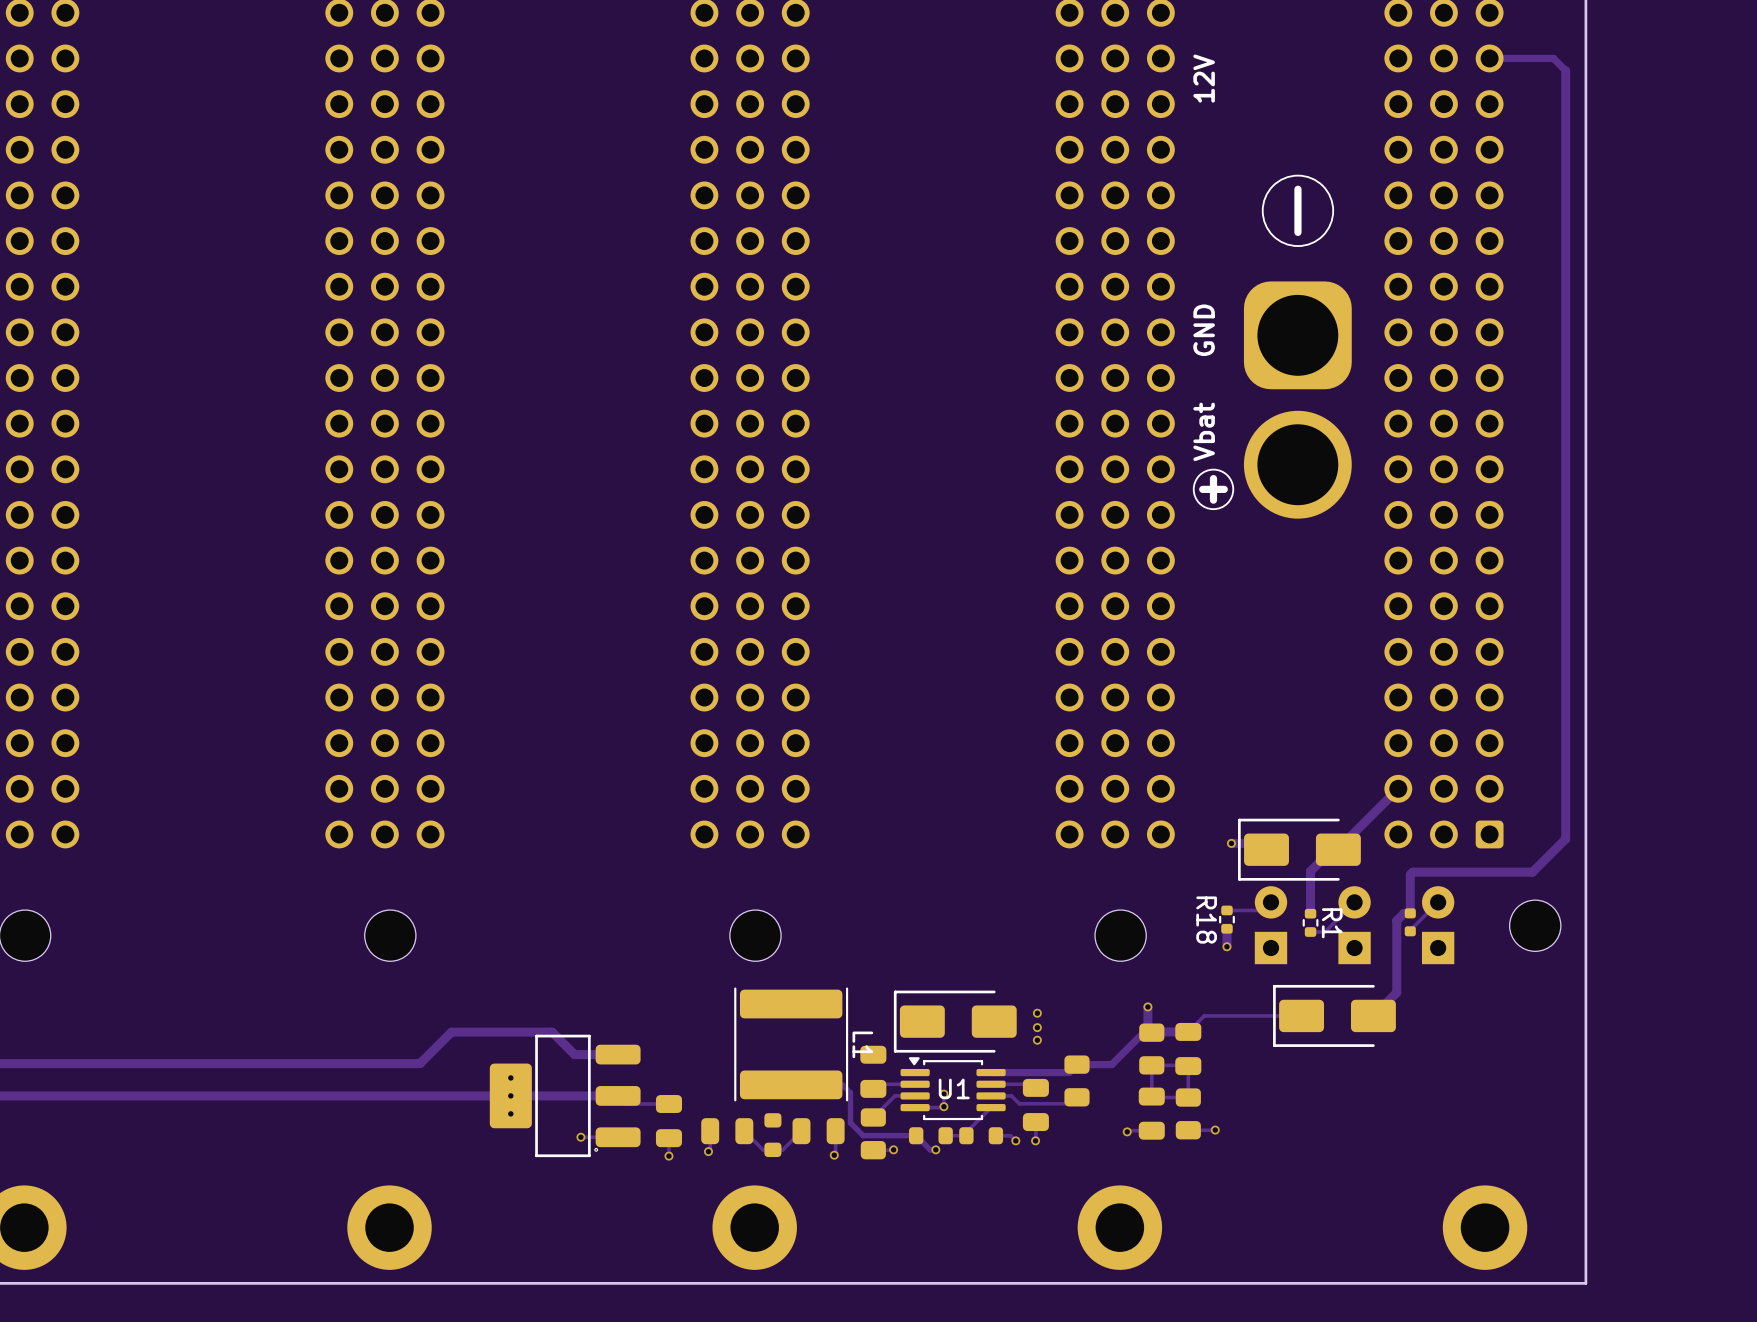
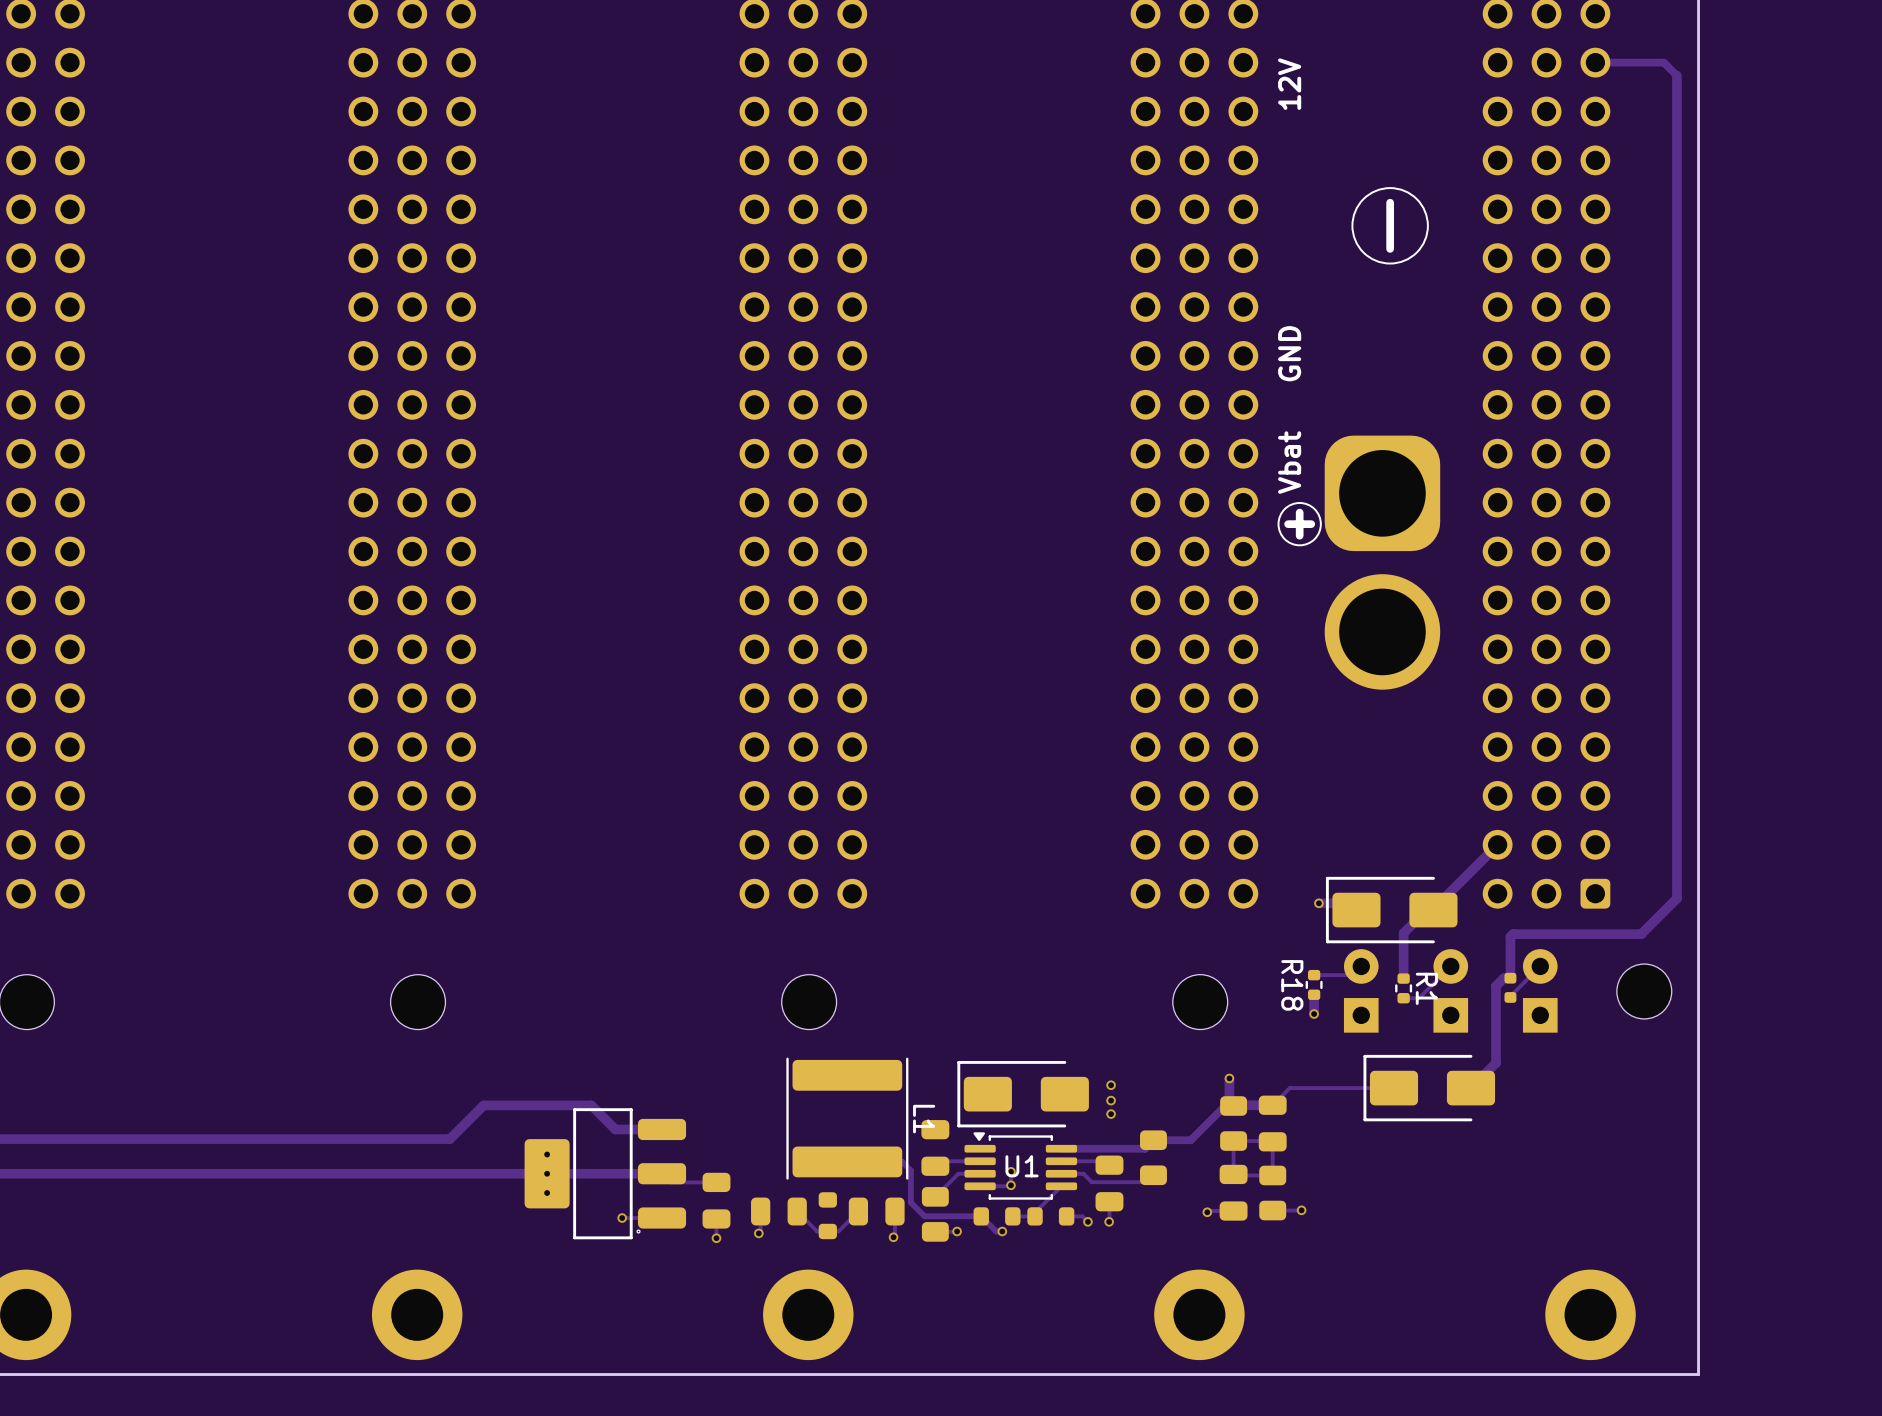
part position: (1297, 400) -> (1382, 562)

